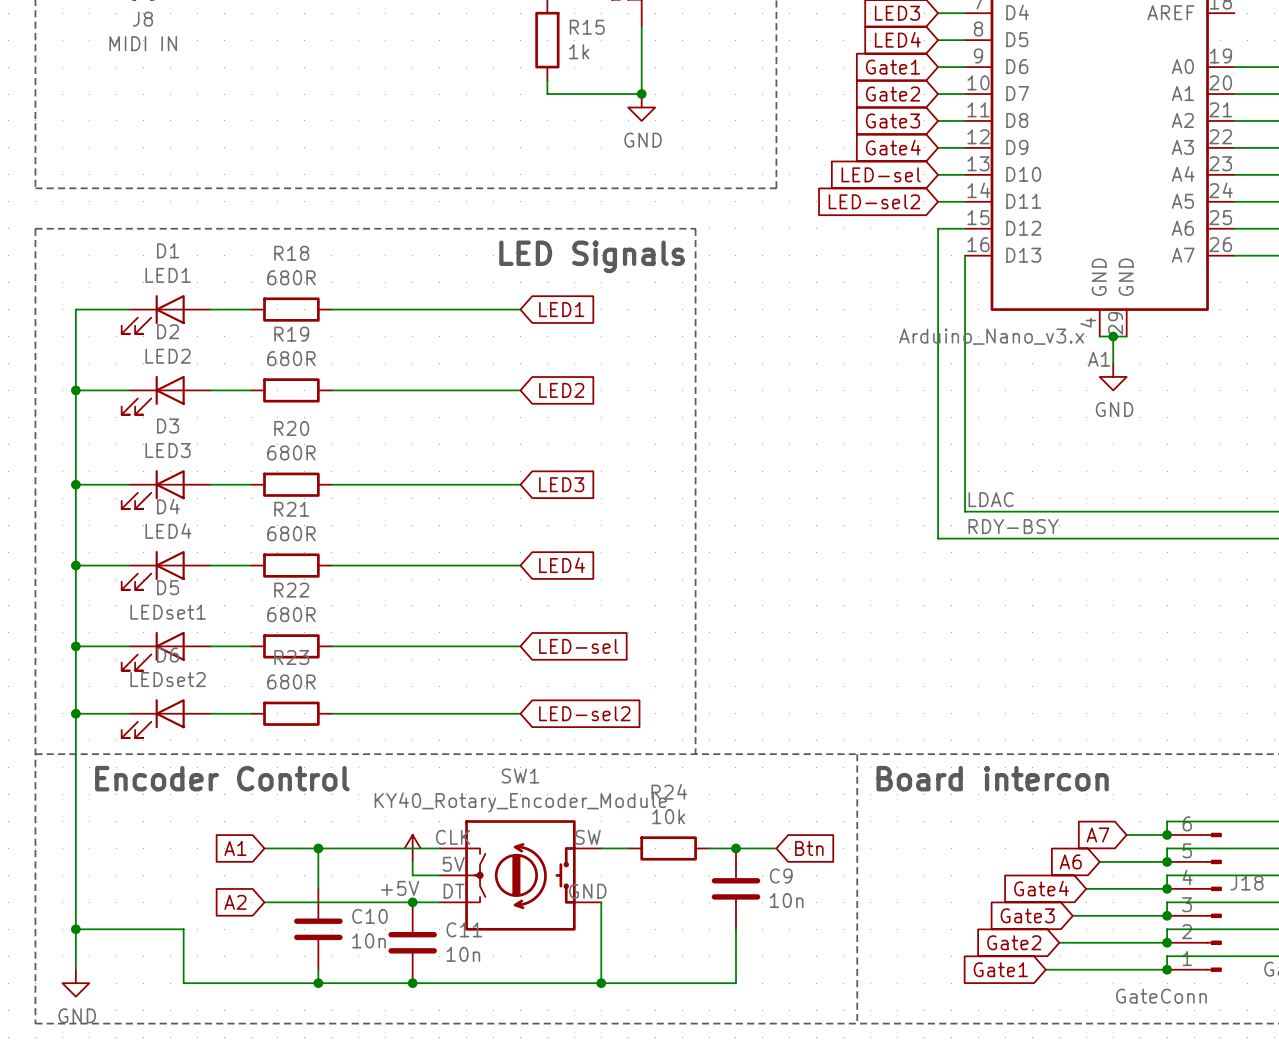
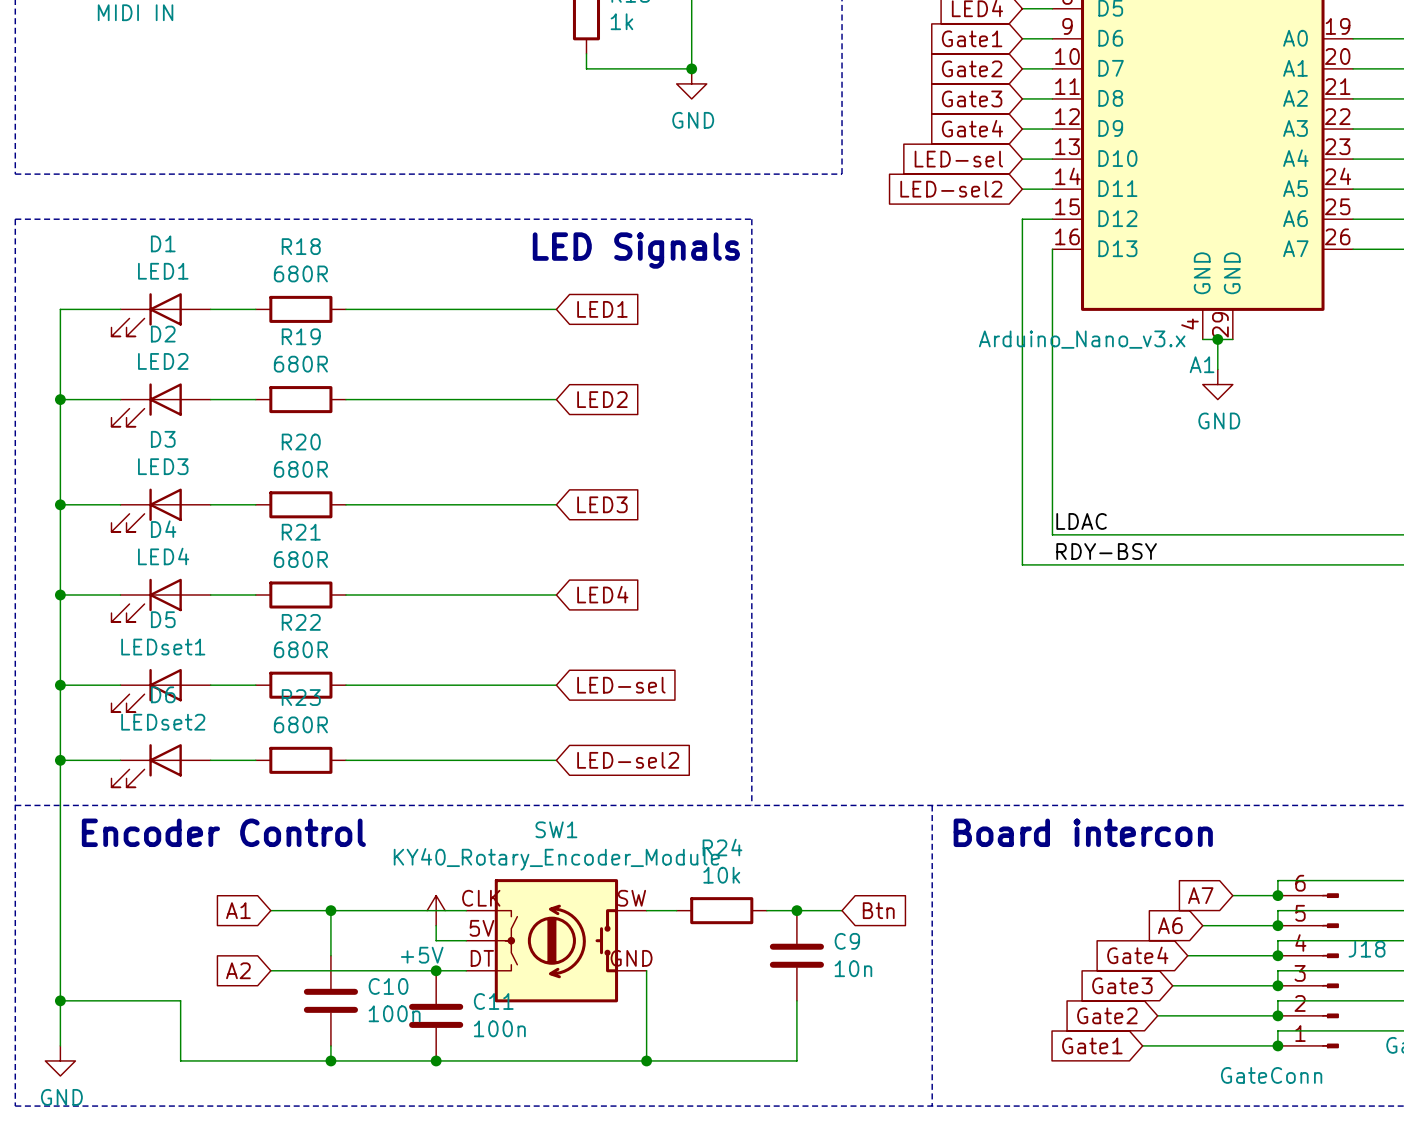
C10 value: 10n (369, 940) -> 100n (394, 1013)
C11 value: 10n (463, 954) -> 100n (499, 1028)

